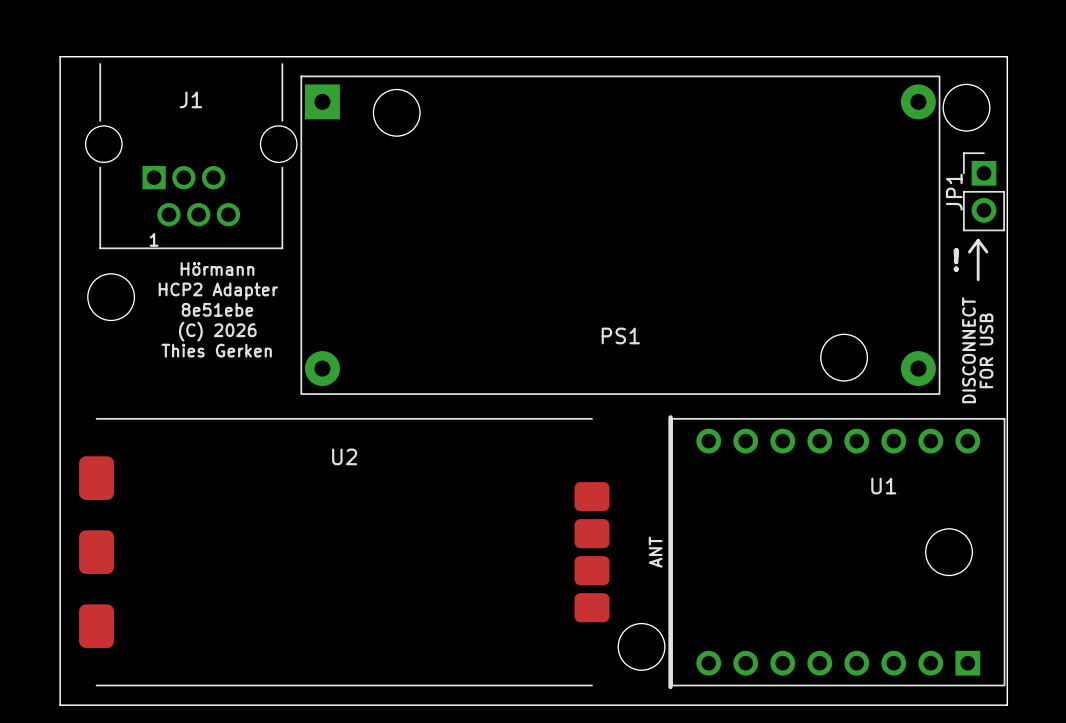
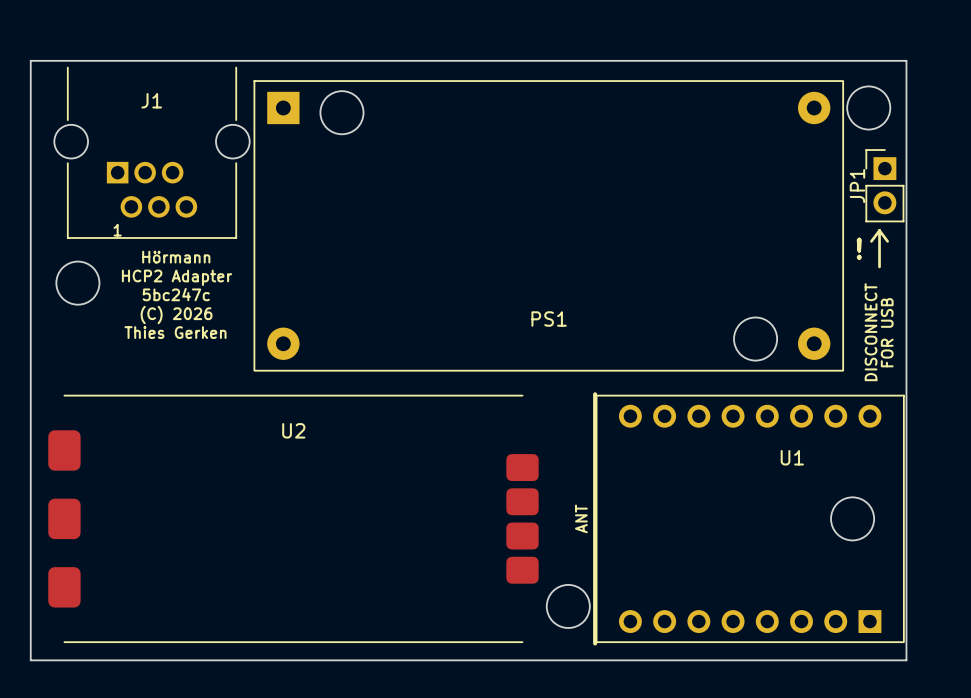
PS1 footprint: [300, 75, 941, 395] -> [253, 80, 844, 372]
text: 8e51ebe (217, 309) -> 5bc247c (176, 294)

